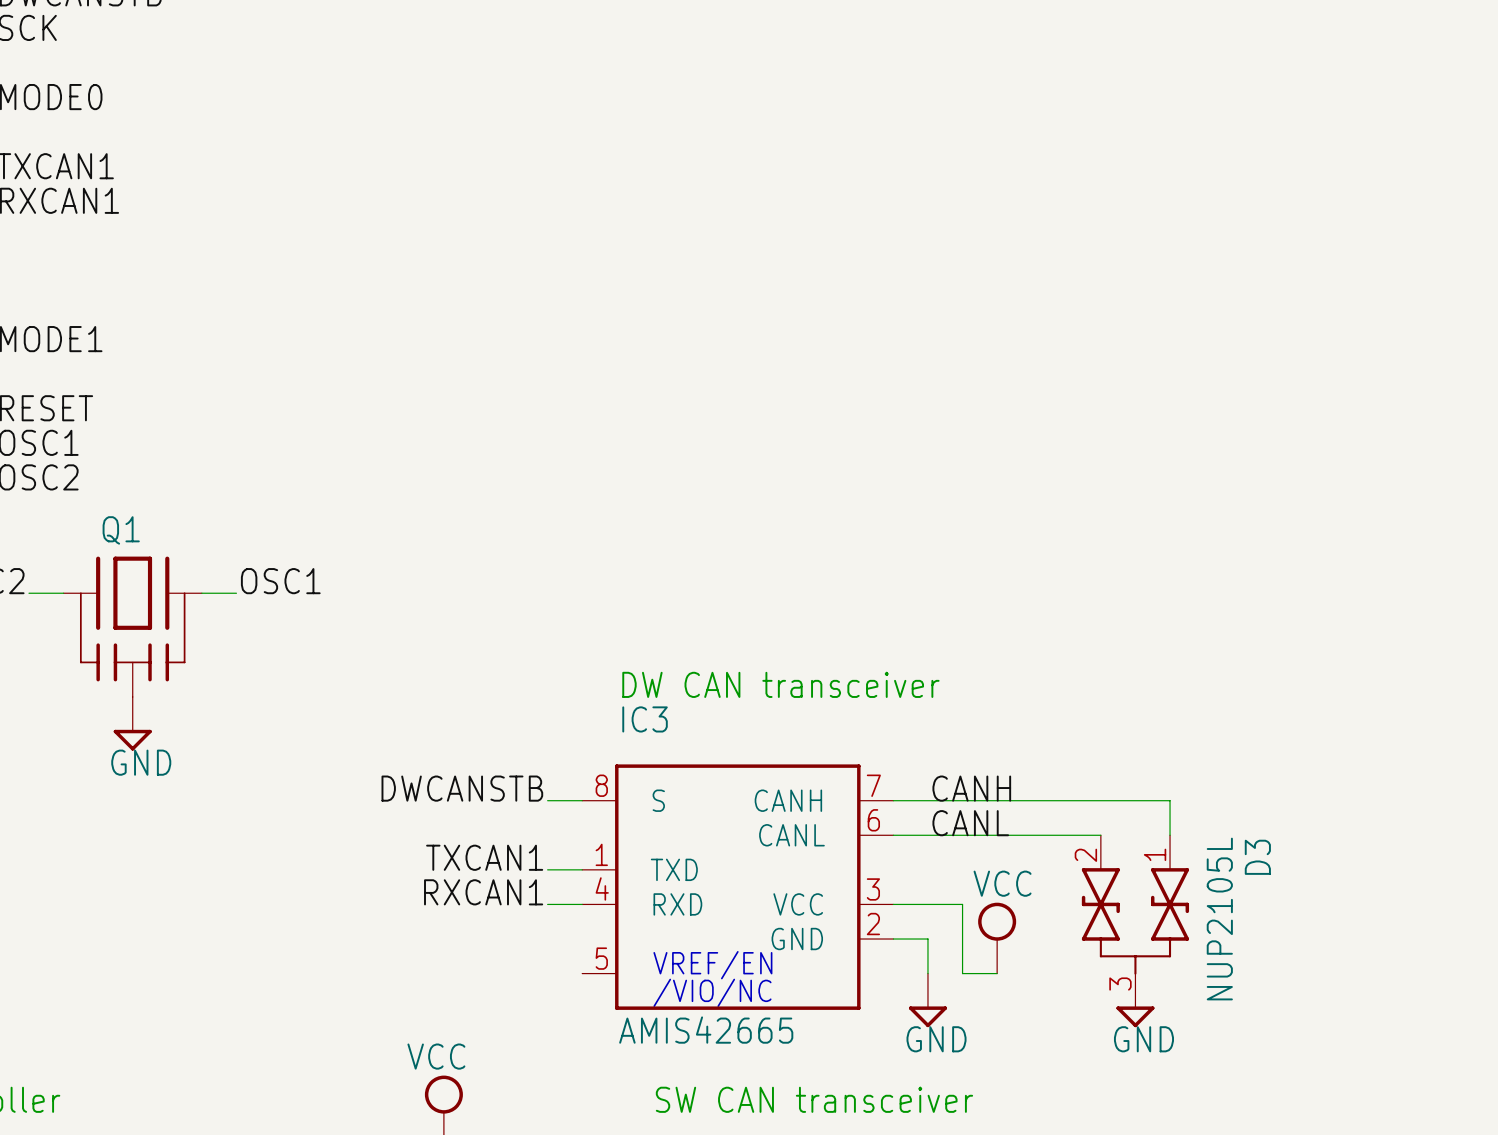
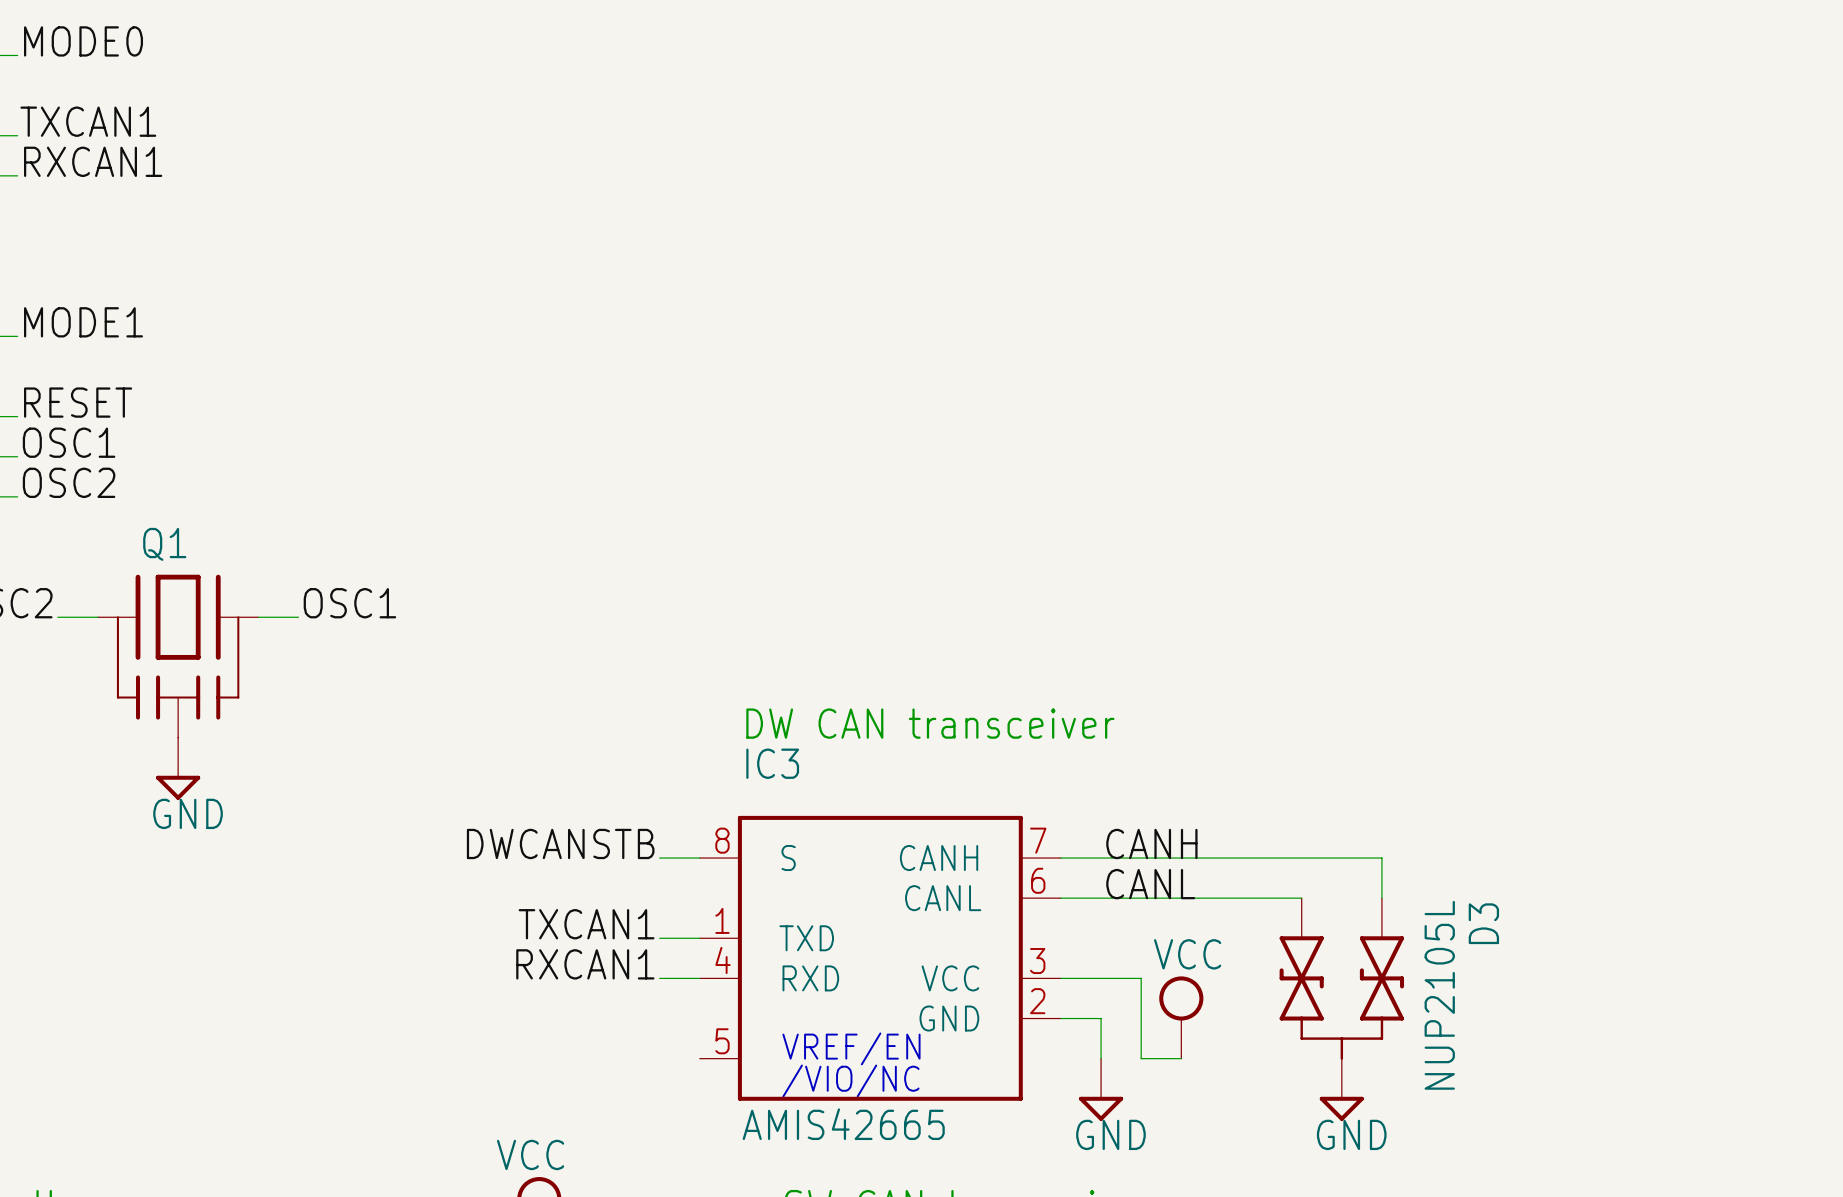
D3 pin number: 1 (1155, 854) -> none
D3 pin number: 2 (1085, 855) -> none
D3 pin number: 3 (1120, 984) -> none

